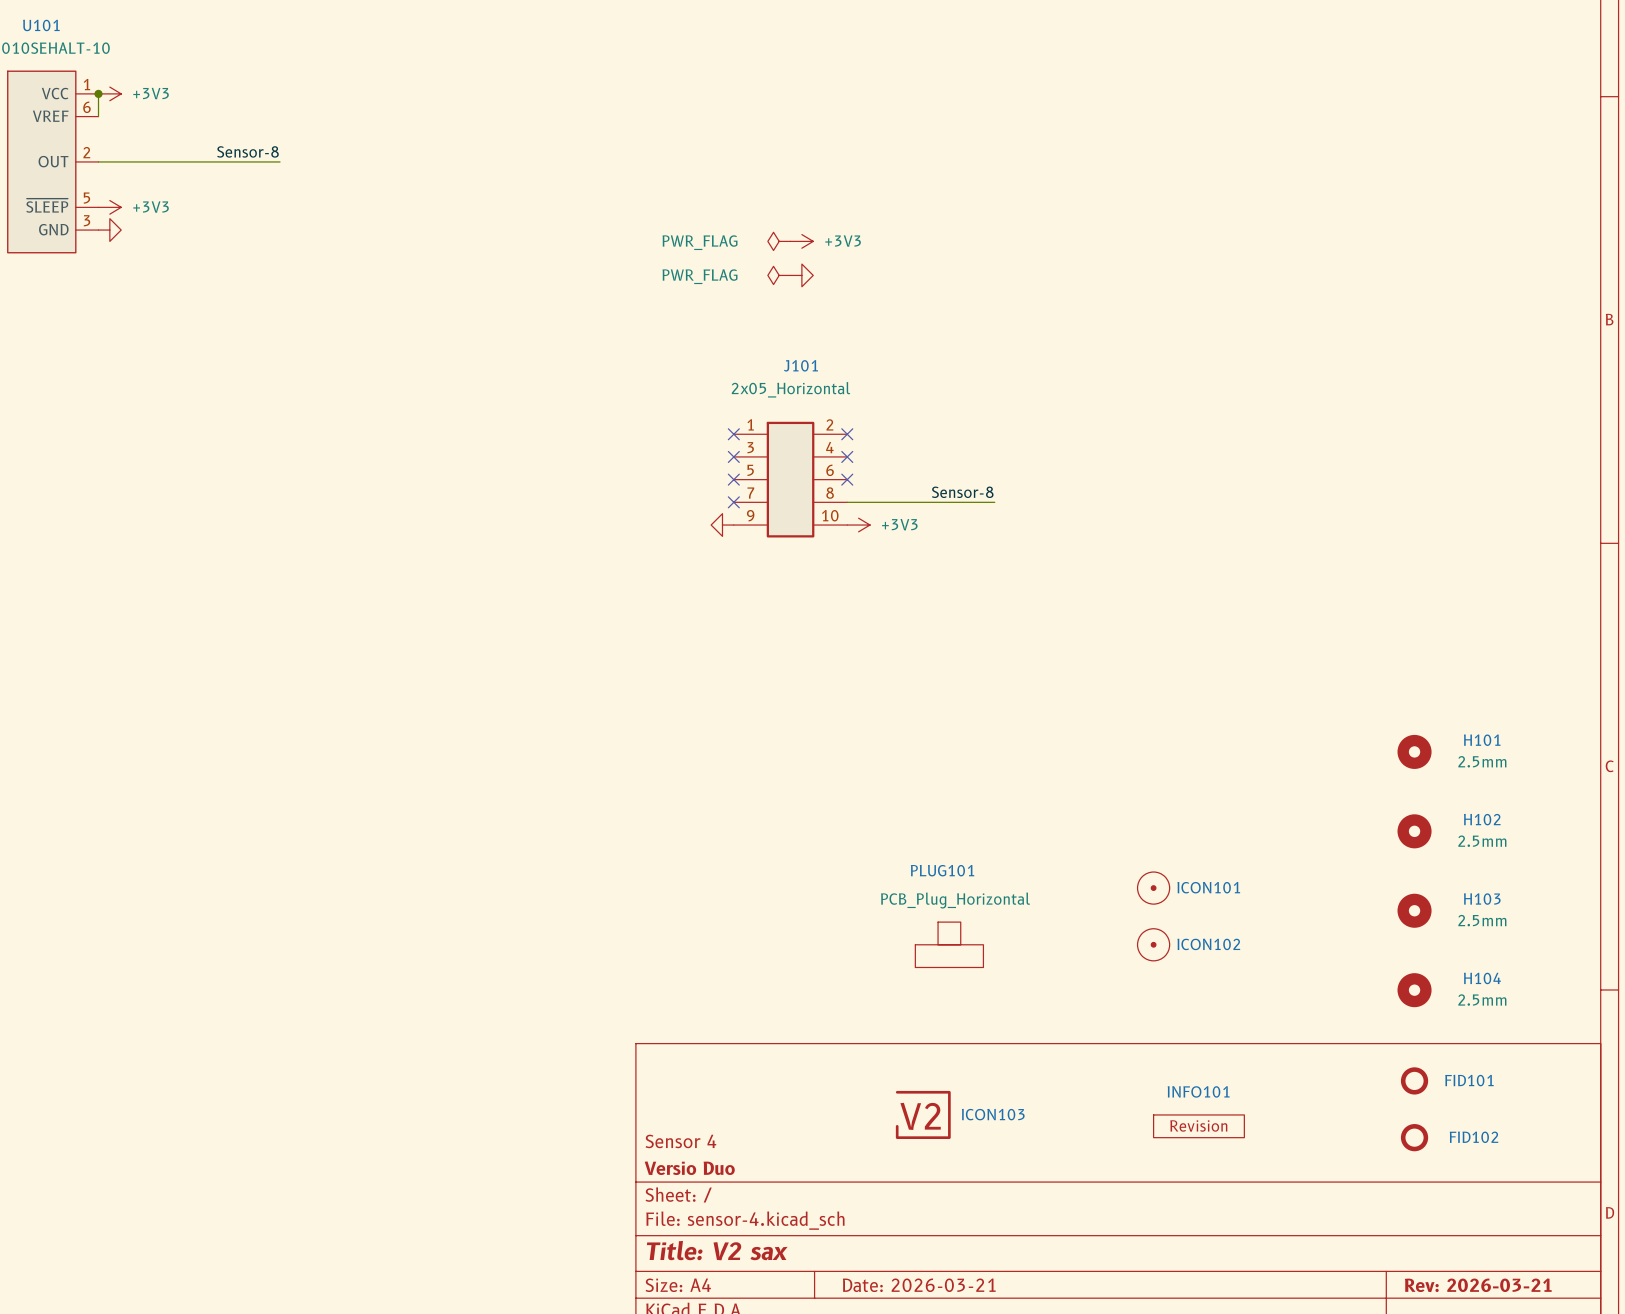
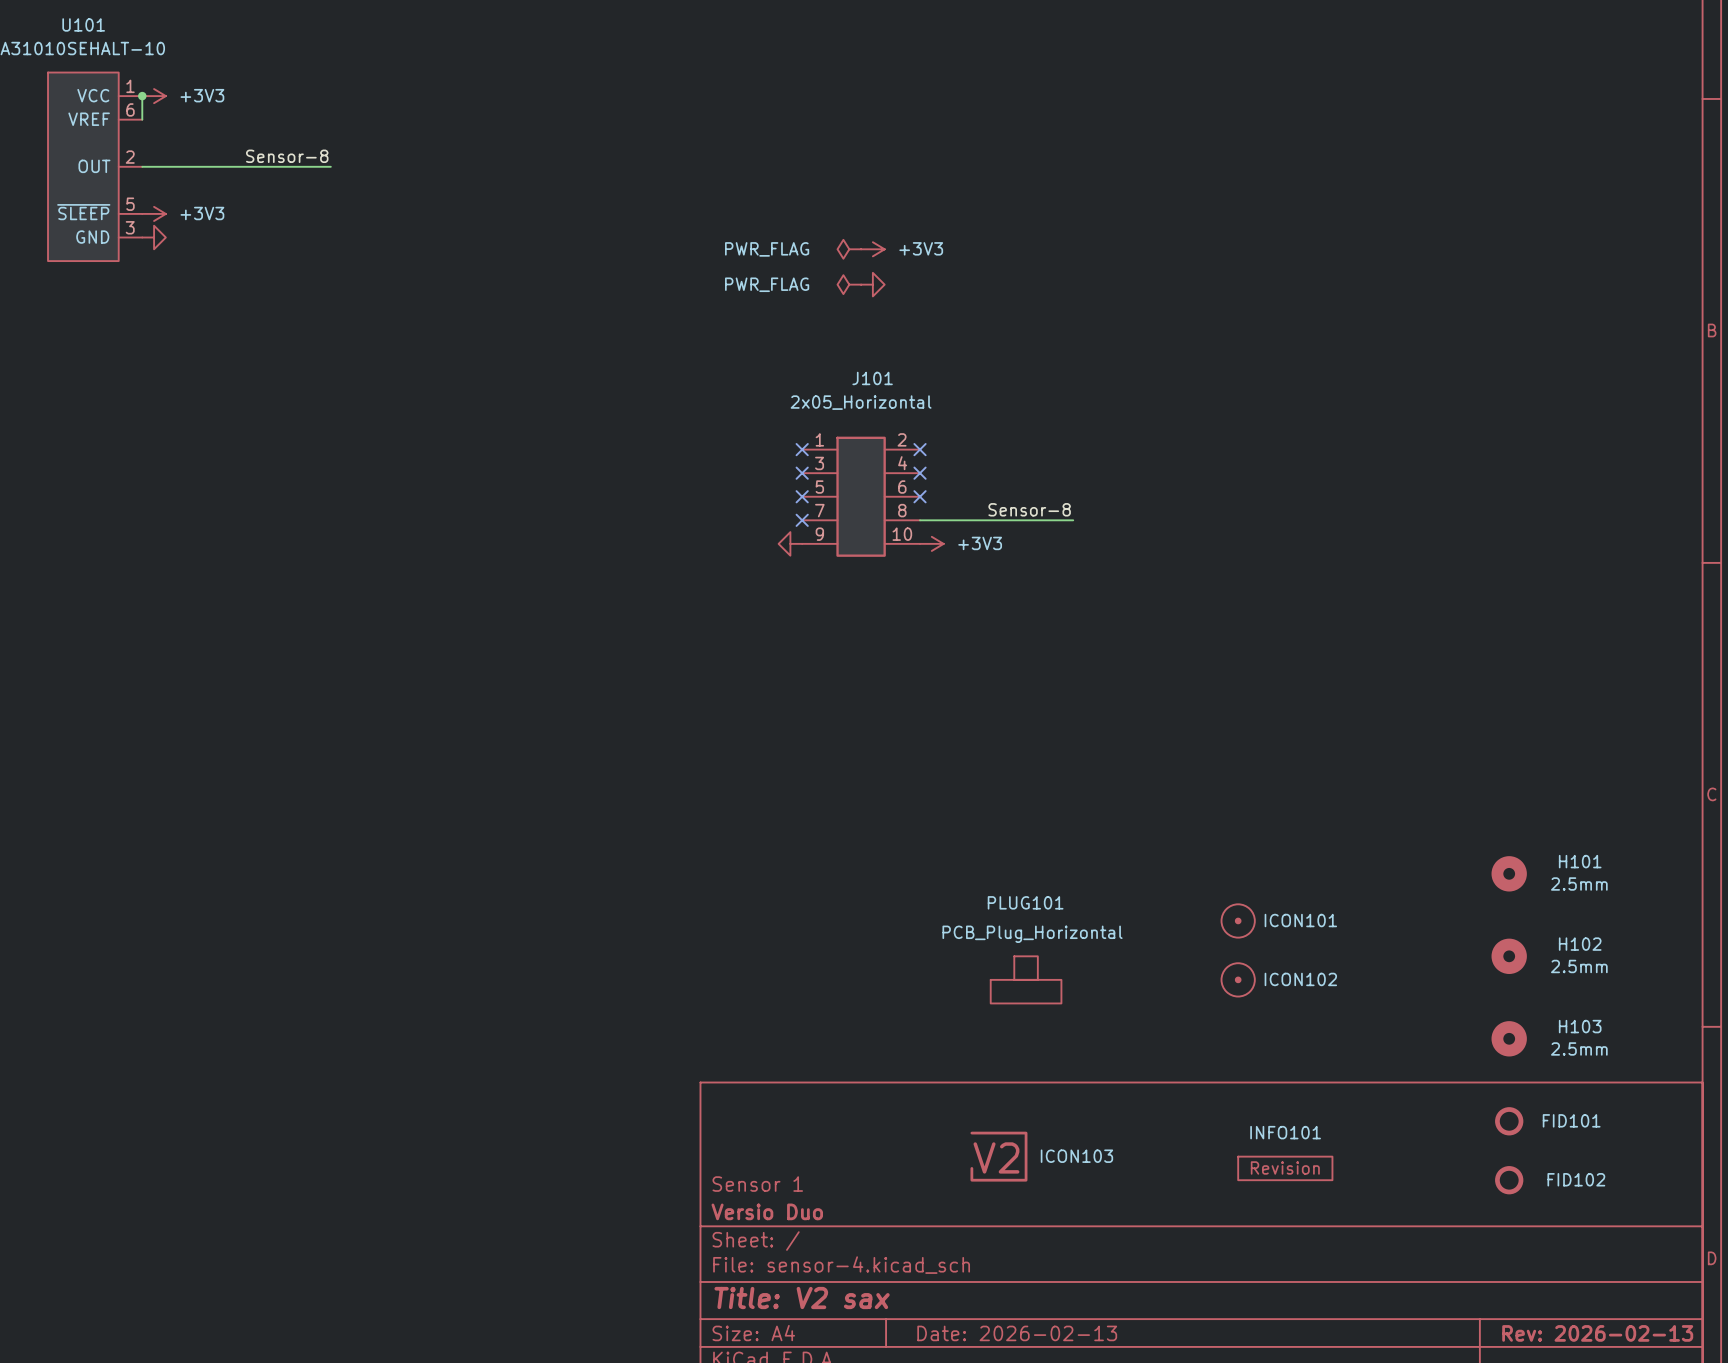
H101 position: (1414, 751) -> (1509, 873)
H102 position: (1414, 831) -> (1509, 956)
H103 position: (1414, 910) -> (1509, 1038)
H104: 2.5mm (1414, 990) -> none
title block: Sensor 4 (680, 1141) -> Sensor 1 (757, 1184)
title block: Date: 2026-03-21 (919, 1285) -> Date: 2026-02-13 (1017, 1333)
title block: Rev: 2026-03-21 (1478, 1285) -> Rev: 2026-02-13 (1597, 1333)

